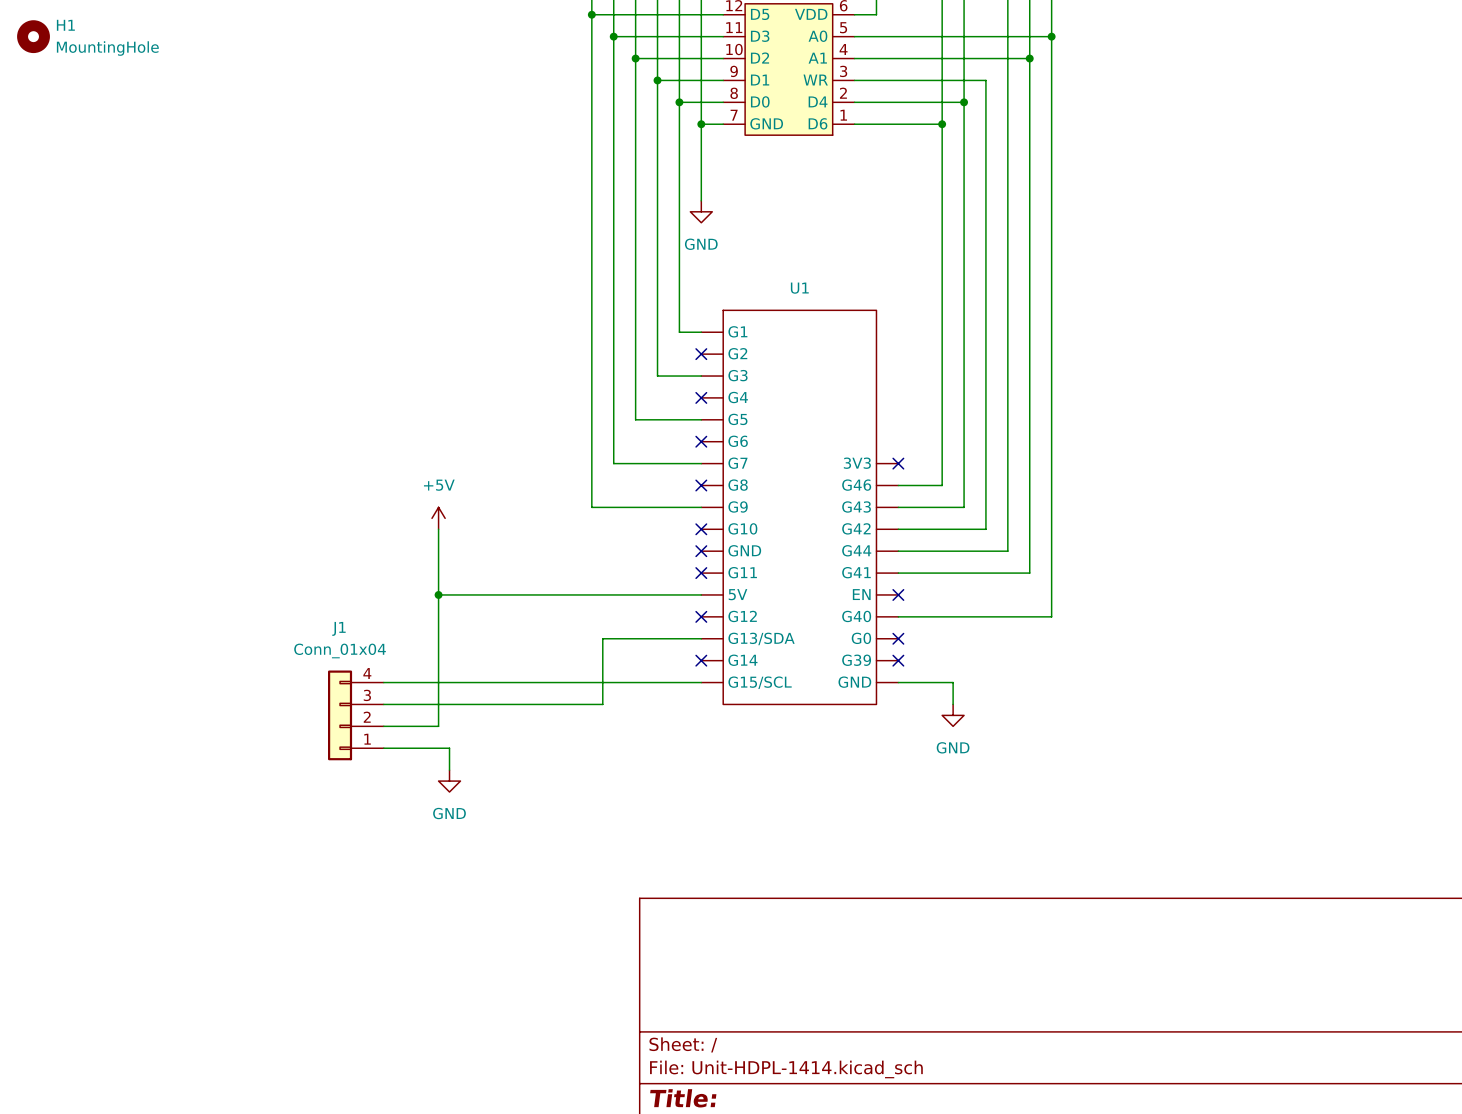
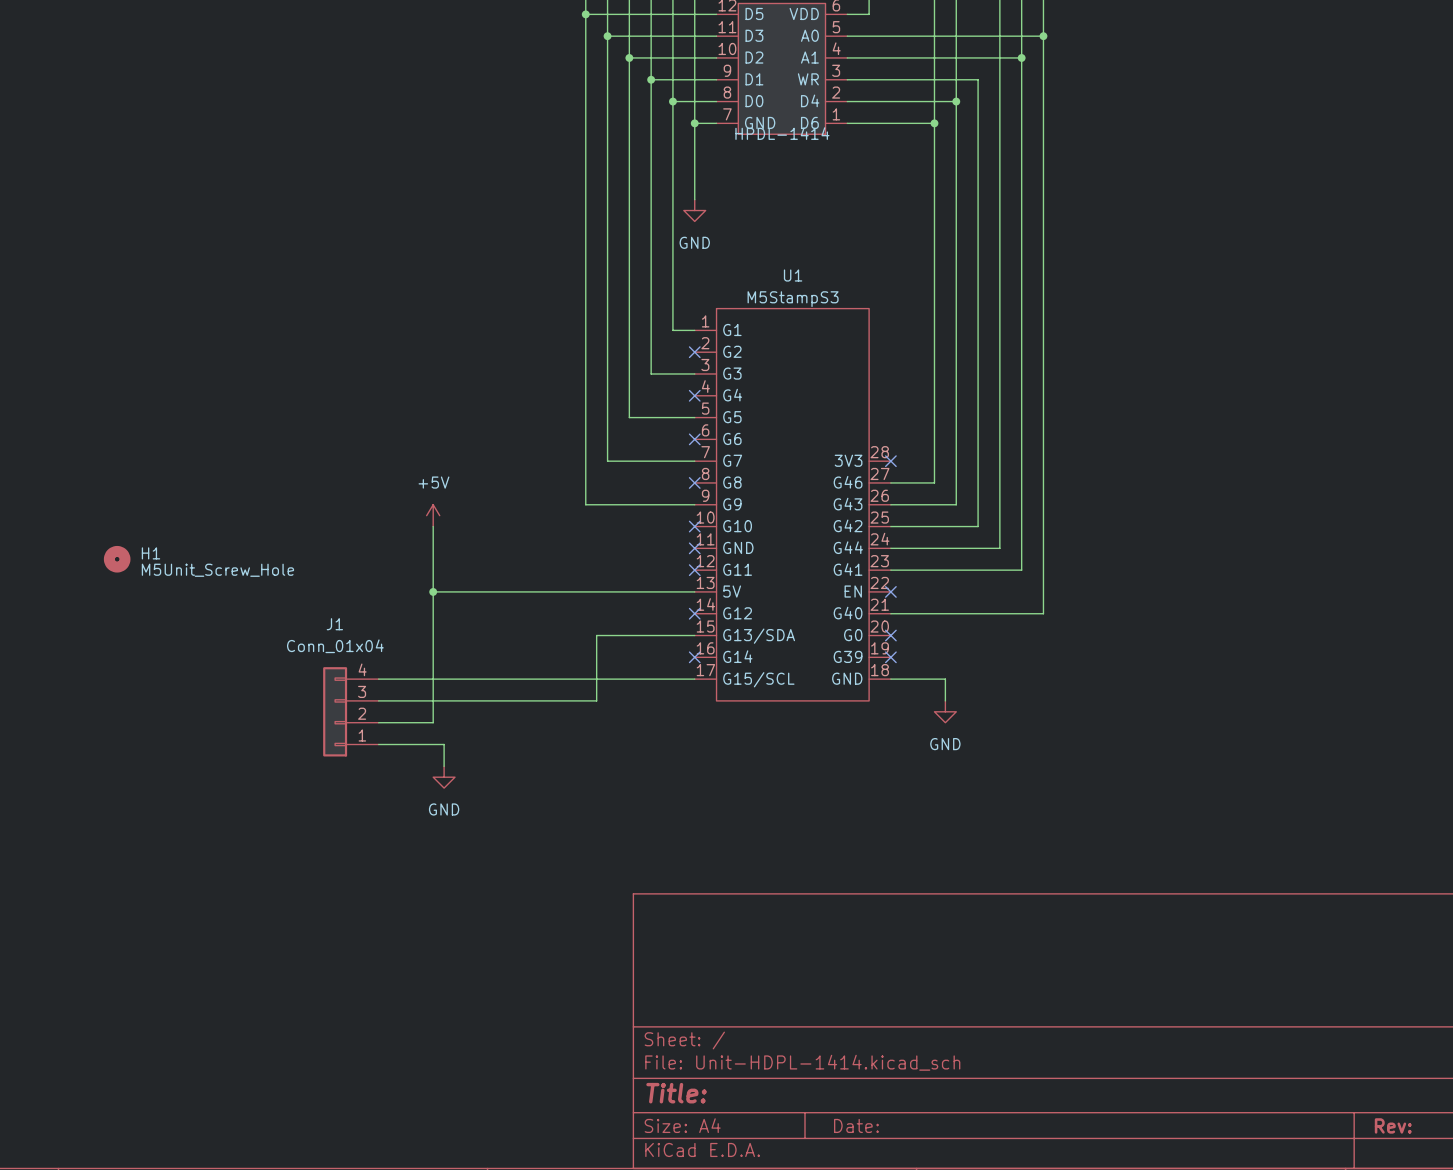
H1 symbol: [17, 20, 50, 54] -> [103, 545, 131, 573]
H1 value: MountingHole (107, 48) -> M5Unit_Screw_Hole (217, 570)
part value: none -> HPDL-1414 (782, 133)
U1 value: none -> M5StampS3 (793, 299)
U1 symbol: [701, 310, 899, 705] -> [694, 308, 891, 701]

